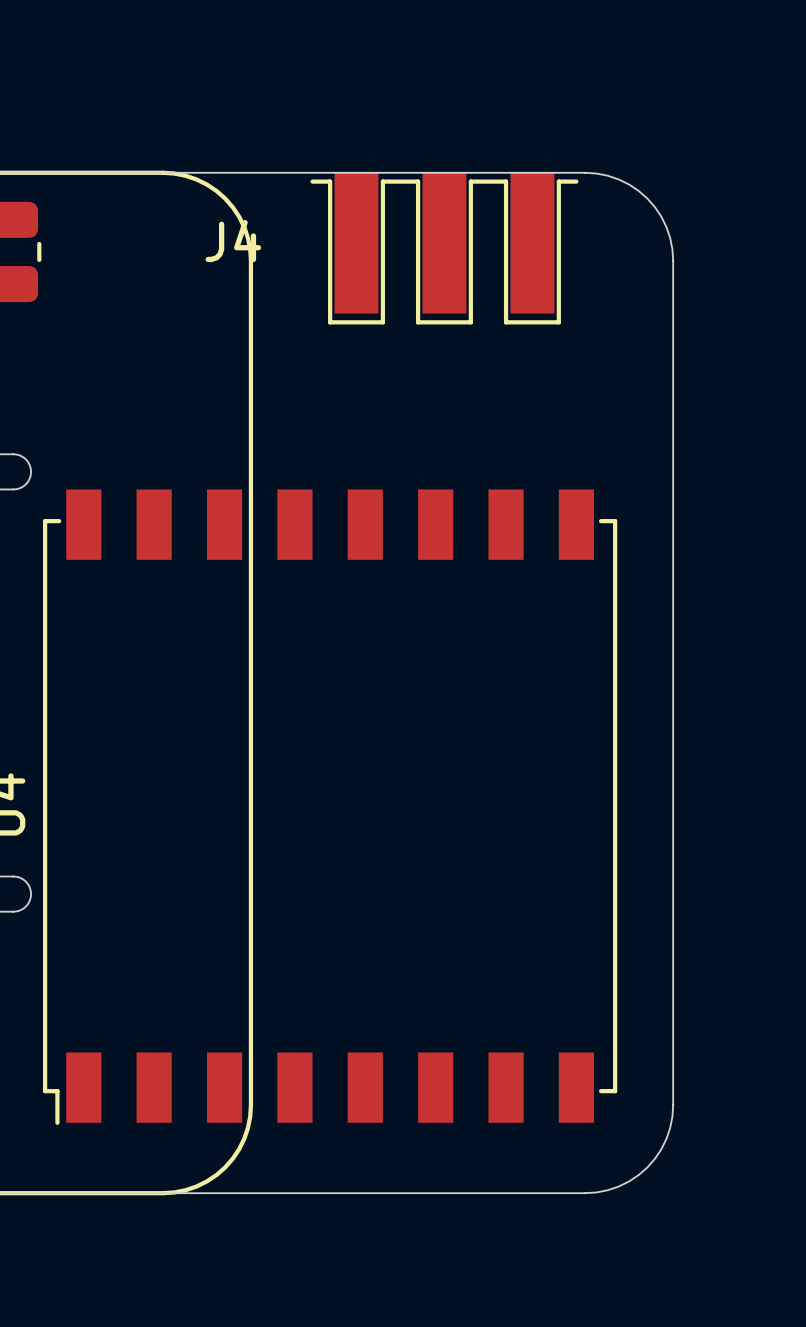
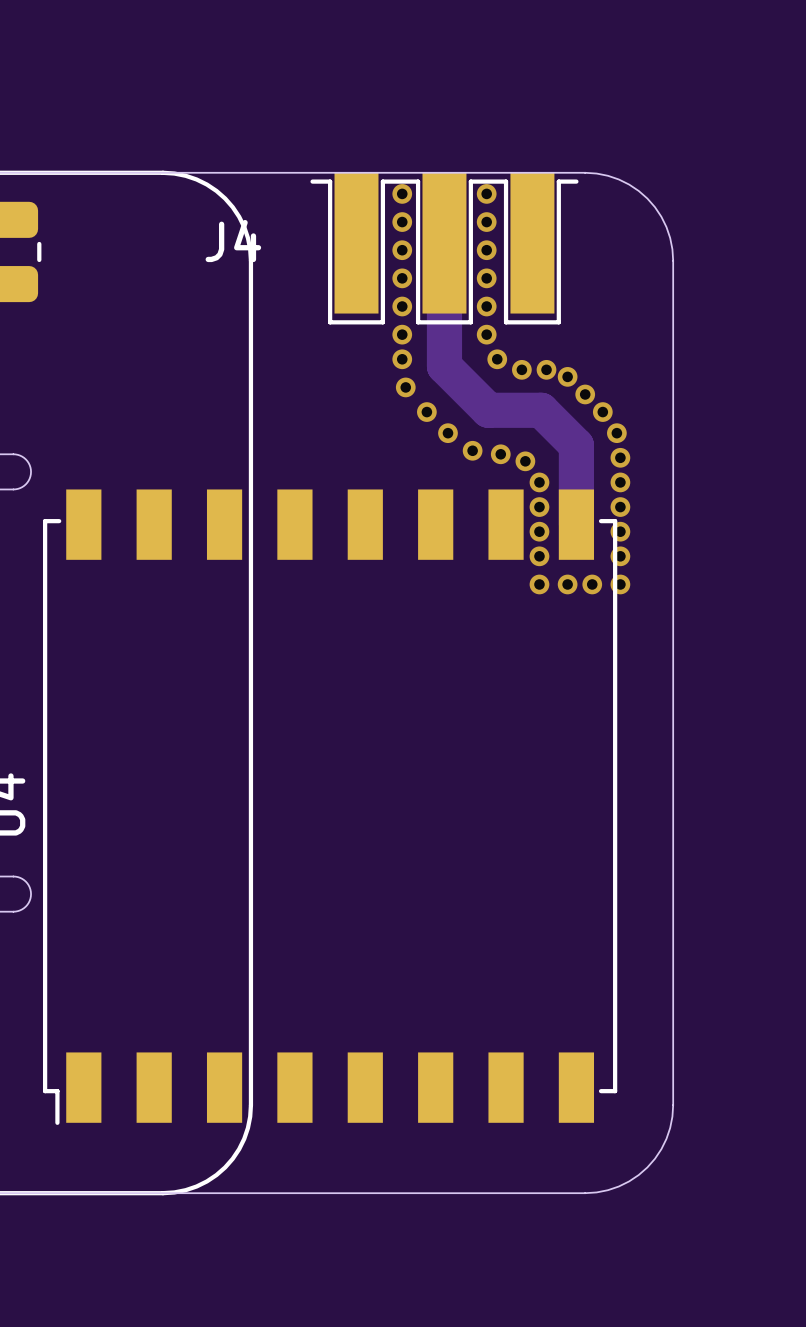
via: none -> (402, 193)
via: none -> (486, 193)
via: none -> (402, 222)
via: none -> (486, 222)
track: none -> (444, 243) (444, 366) (488, 410) (541, 410) (576, 445) (576, 524)
via: none -> (402, 250)
via: none -> (486, 250)
via: none -> (402, 278)
via: none -> (486, 278)
via: none -> (402, 306)
via: none -> (486, 306)
via: none -> (402, 334)
via: none -> (486, 334)
via: none -> (402, 359)
via: none -> (497, 359)
via: none -> (521, 369)
via: none -> (546, 369)
via: none -> (567, 376)
via: none -> (405, 387)
via: none -> (585, 394)
via: none -> (426, 412)
via: none -> (602, 412)
via: none -> (447, 433)
via: none -> (616, 433)
via: none -> (472, 450)
via: none -> (500, 454)
via: none -> (620, 457)
via: none -> (525, 461)
via: none -> (539, 482)
via: none -> (620, 482)
via: none -> (539, 507)
via: none -> (620, 507)
via: none -> (539, 531)
via: none -> (620, 531)
via: none -> (539, 556)
via: none -> (620, 556)
via: none -> (539, 584)
via: none -> (567, 584)
via: none -> (592, 584)
via: none -> (620, 584)

